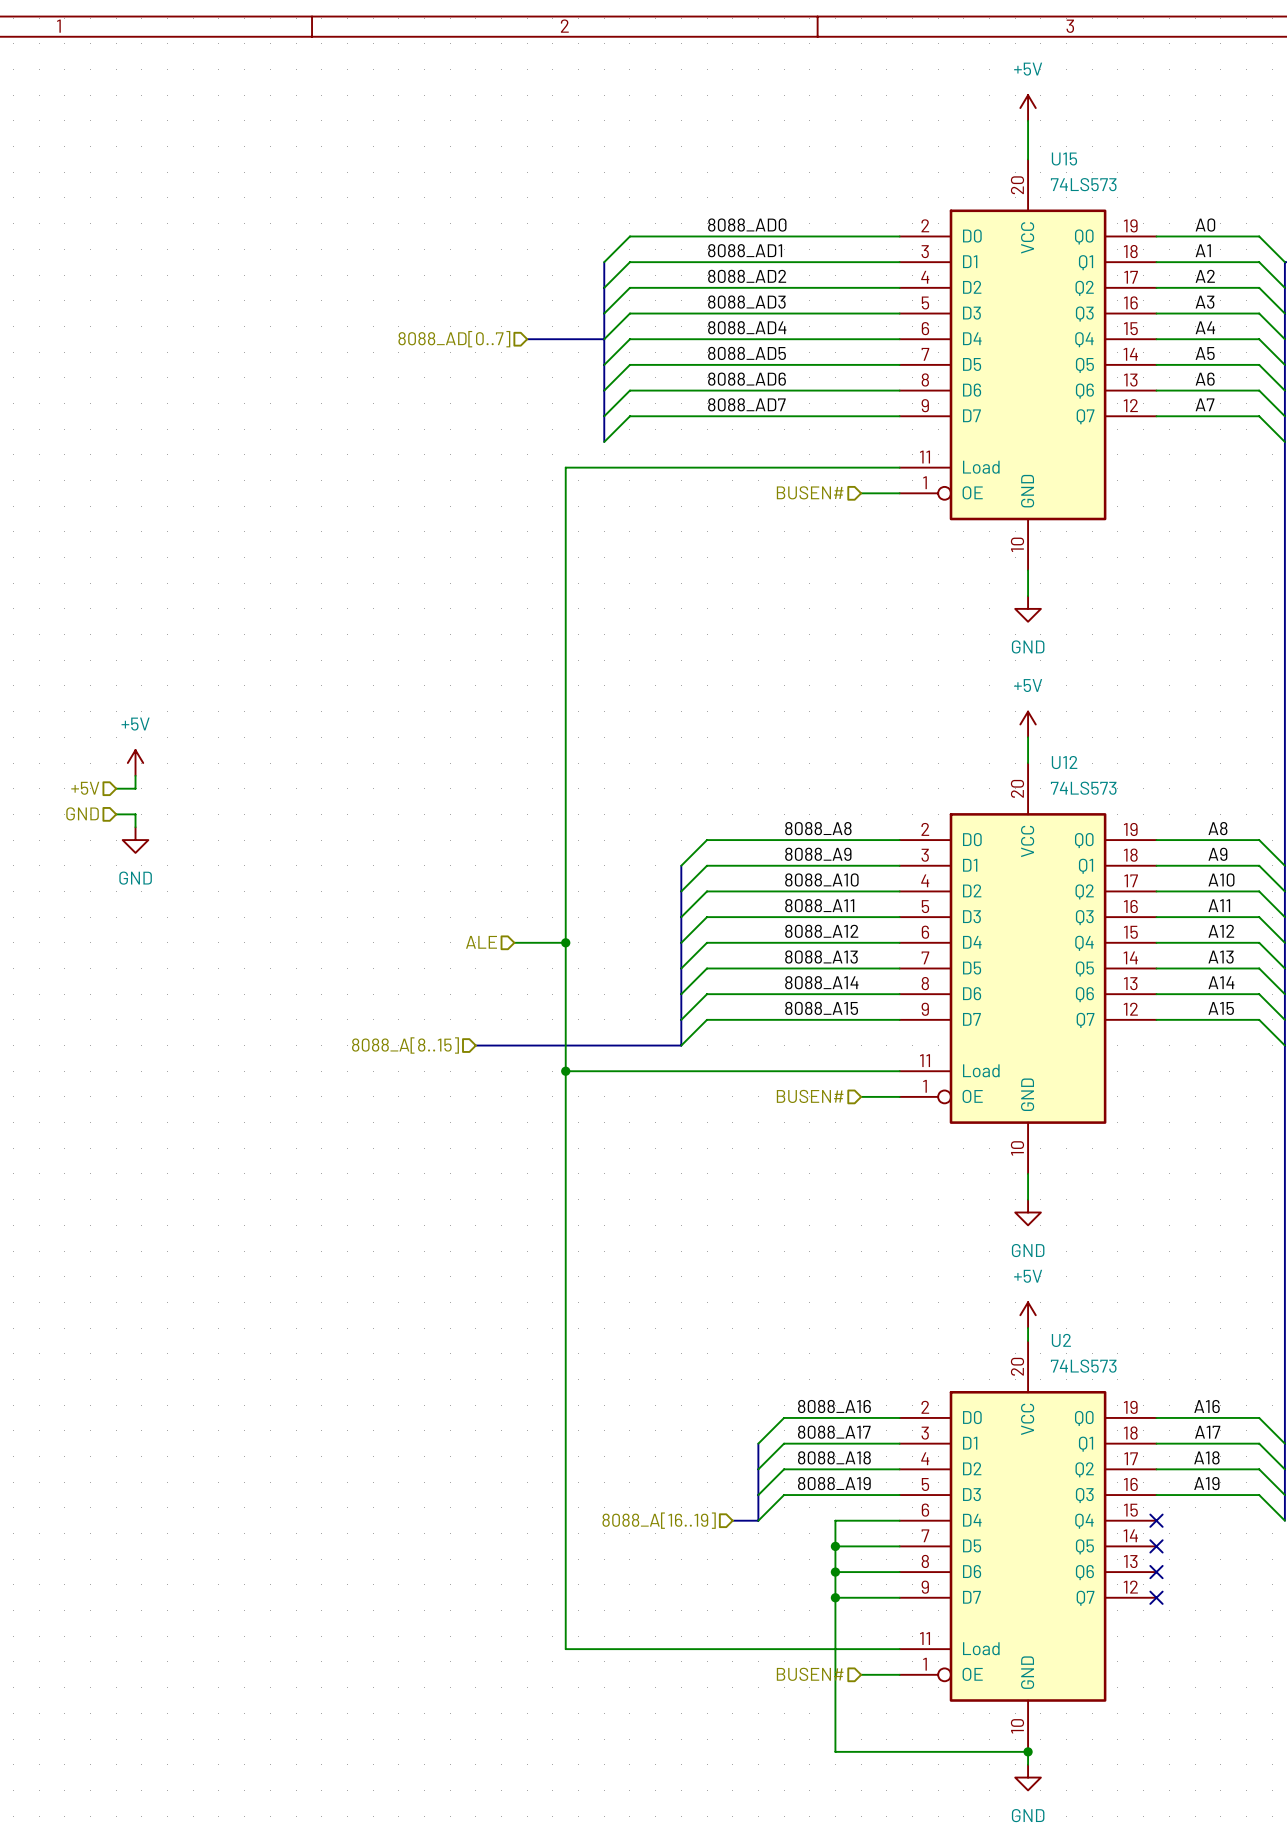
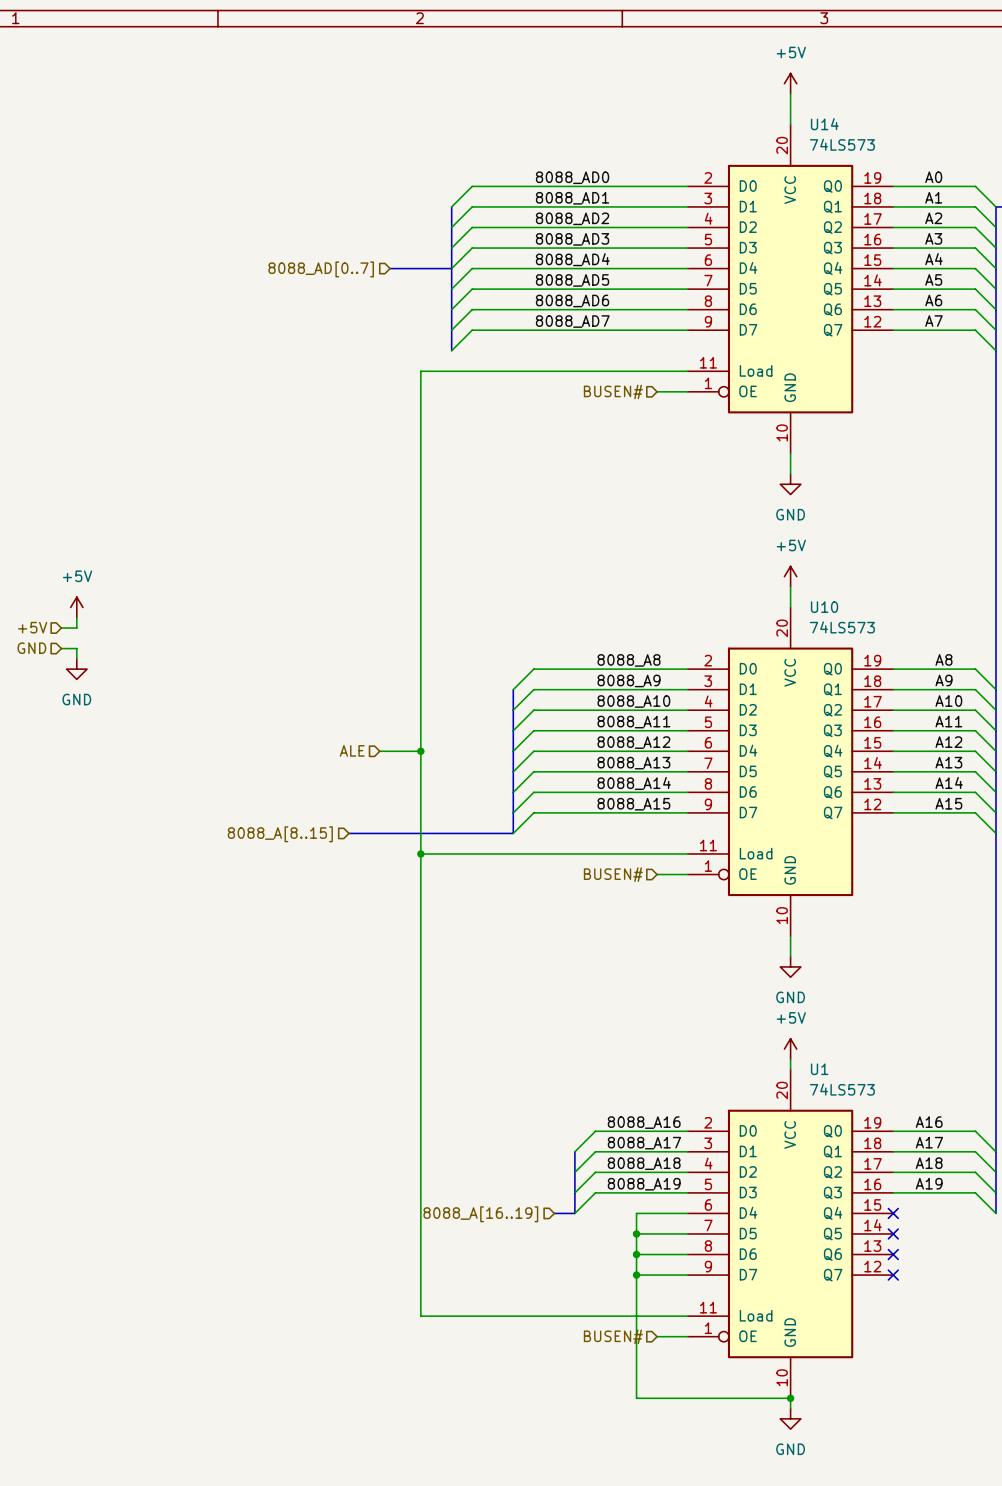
U15 name: U15 (1064, 159) -> U14 (824, 124)
U12 name: U12 (1064, 762) -> U10 (824, 607)
U2 name: U2 (1061, 1340) -> U1 (819, 1069)

